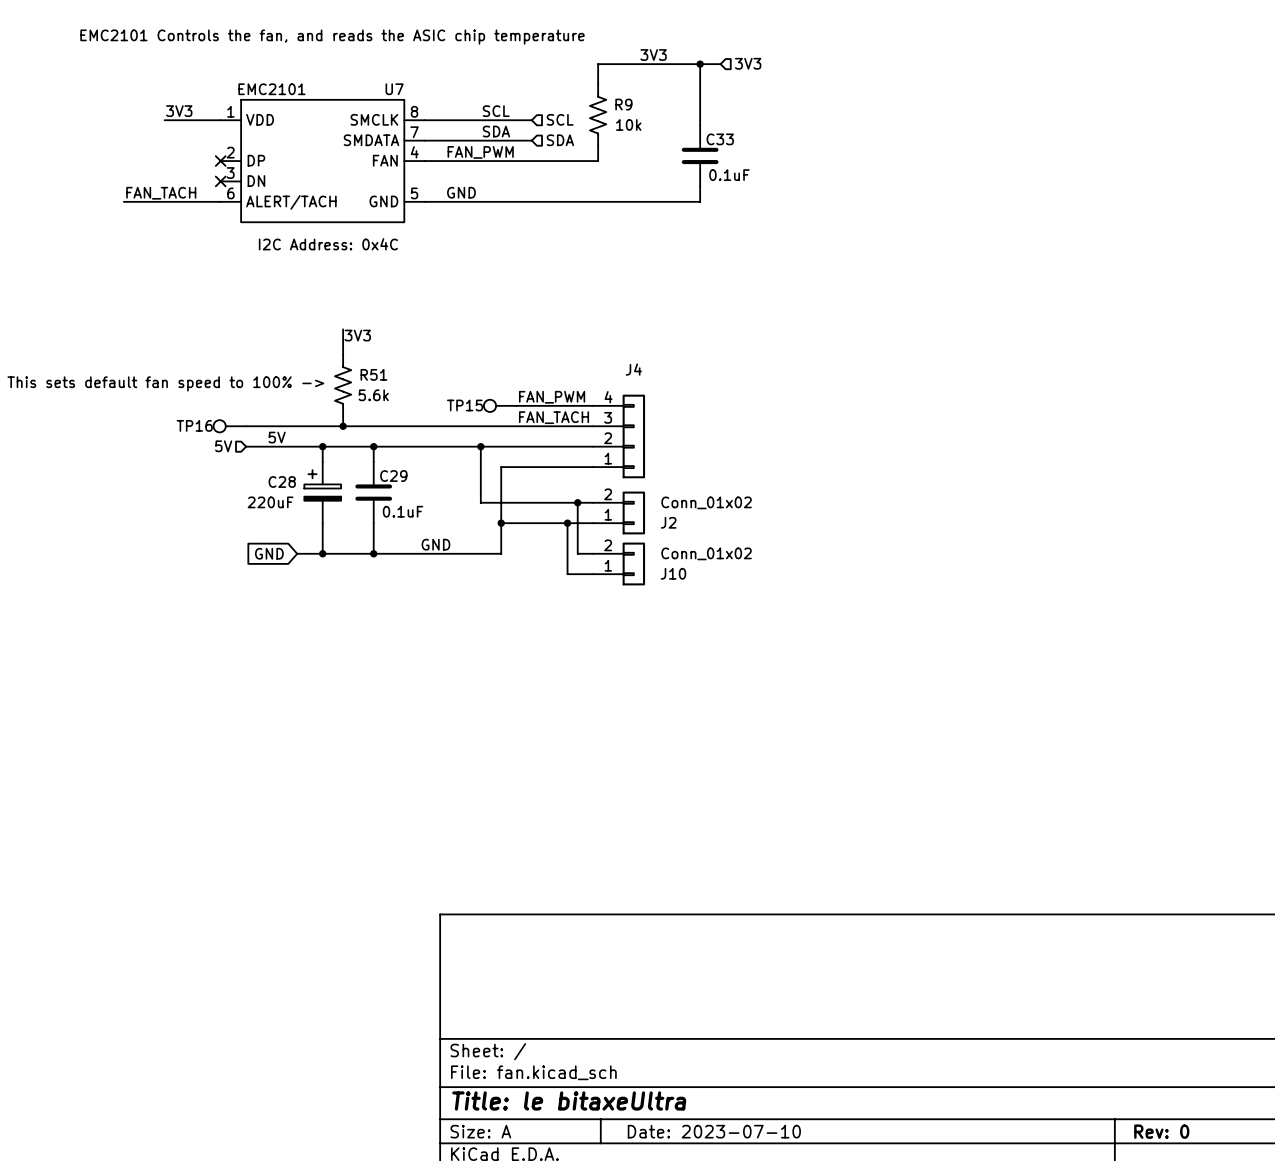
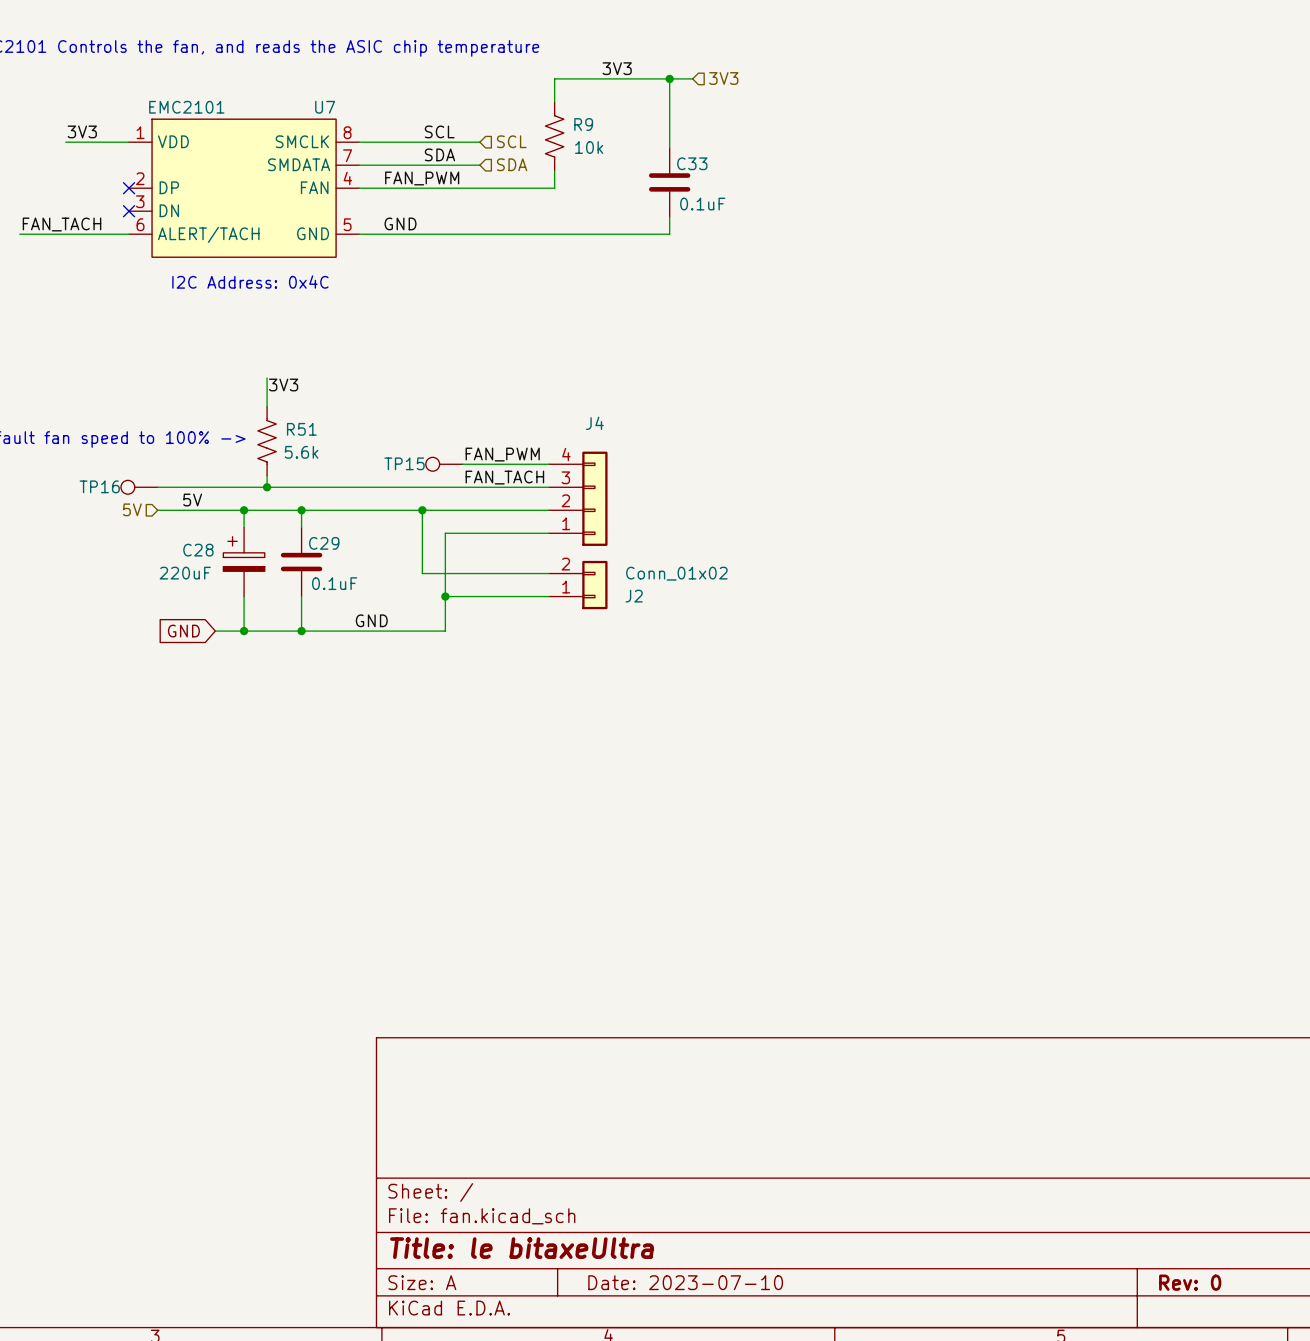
wire: (577, 502) (577, 553) (593, 553) -> none
junction: (577, 502) -> none
wire: (567, 523) (567, 574) (593, 574) -> none
junction: (567, 523) -> none
J10: Conn_01x02 (619, 563) -> none

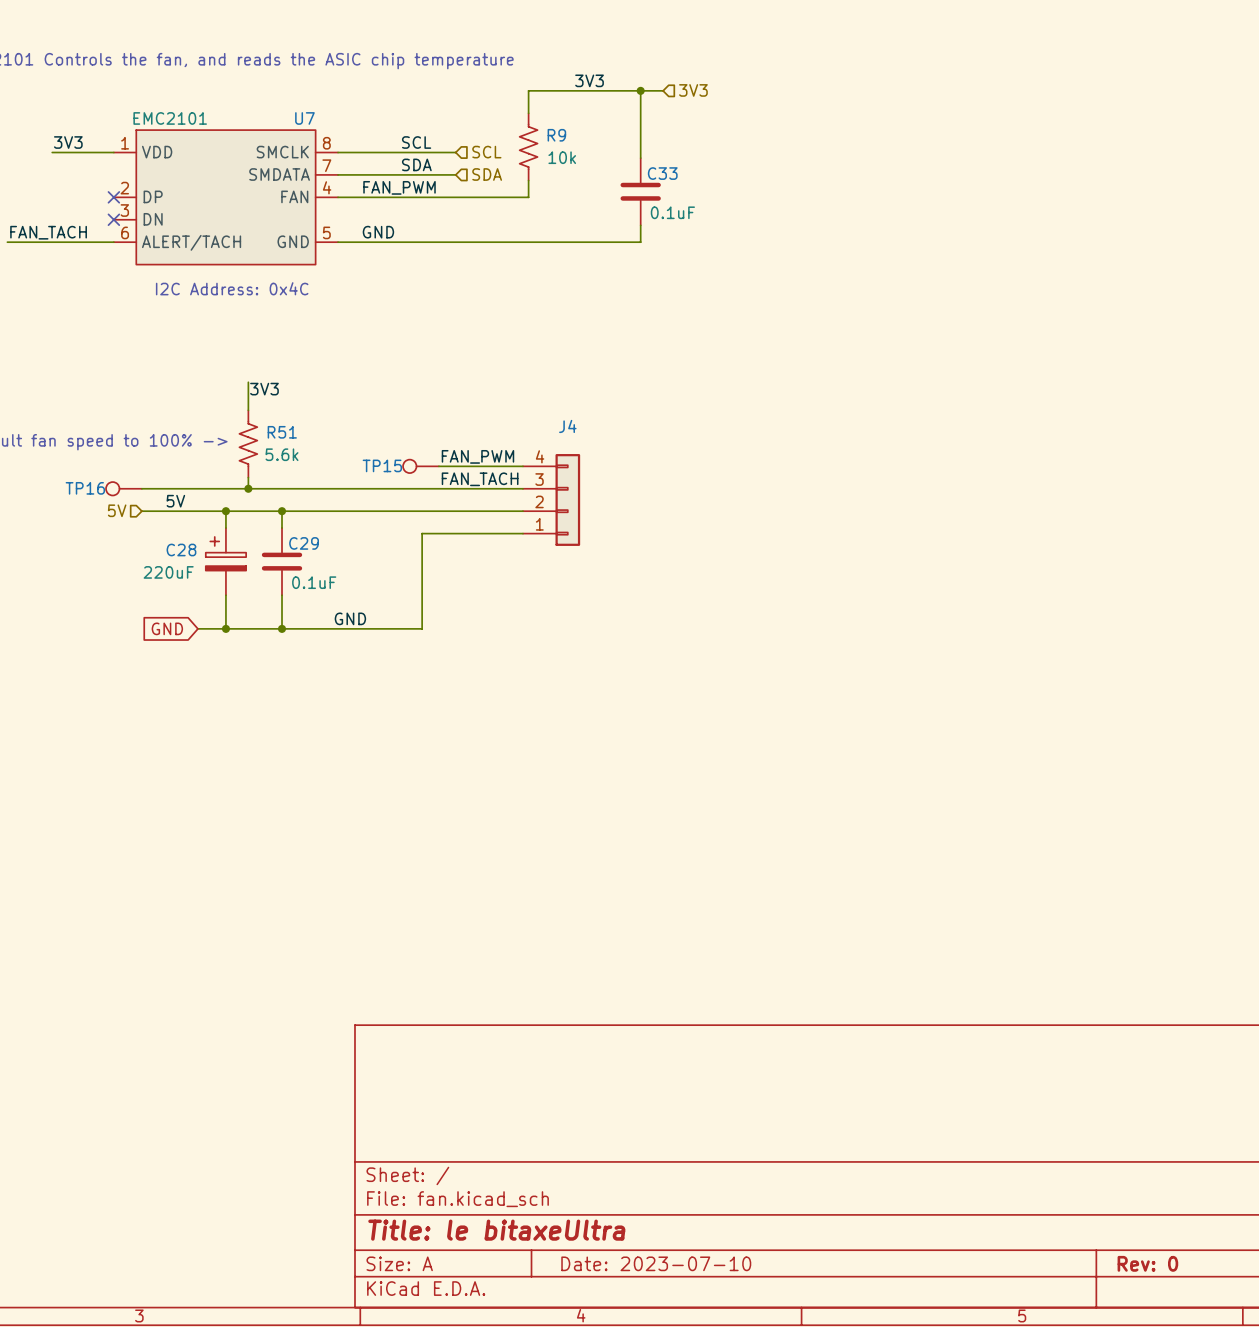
wire: (422, 510) (422, 573) (548, 573) -> none
junction: (422, 510) -> none
J2: Conn_01x02 (578, 585) -> none
wire: (445, 596) (548, 596) -> none
junction: (445, 596) -> none

